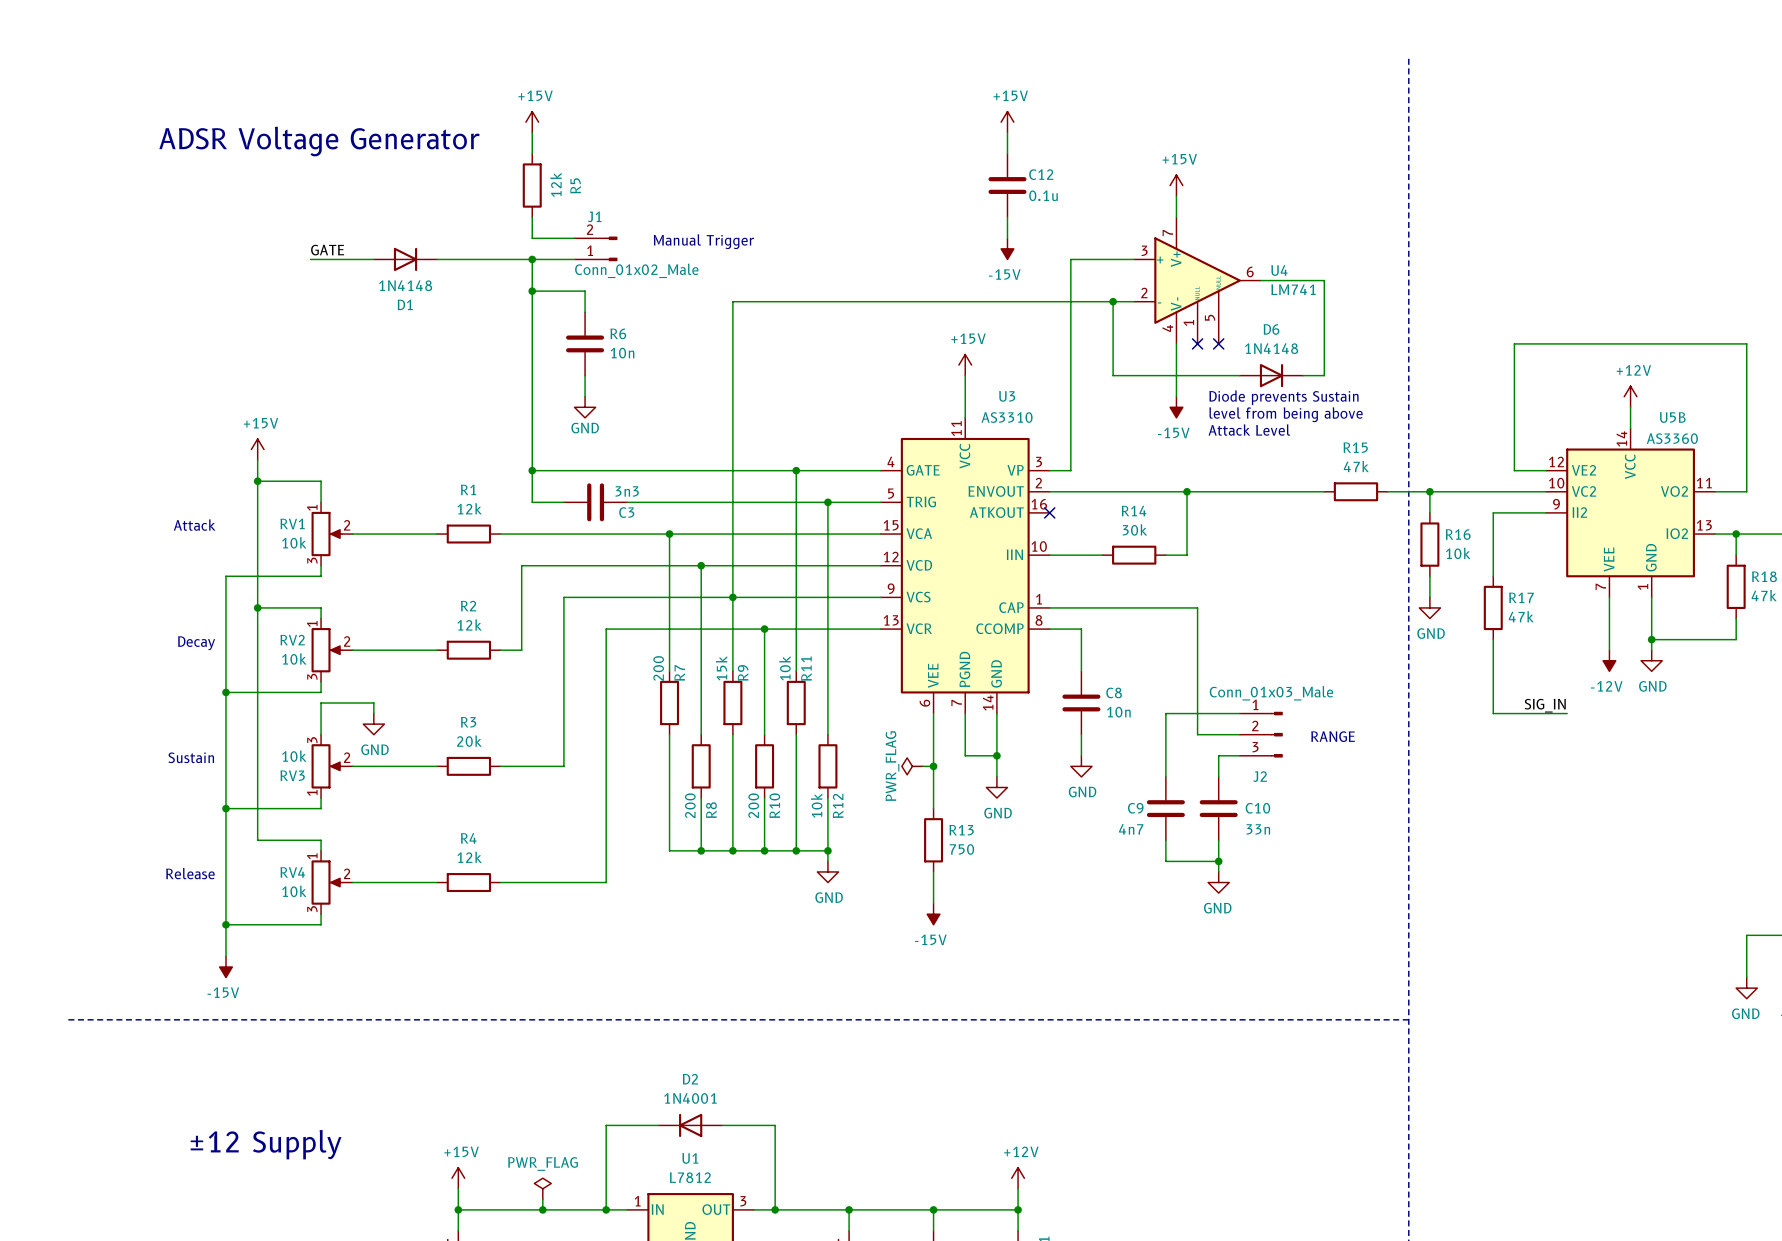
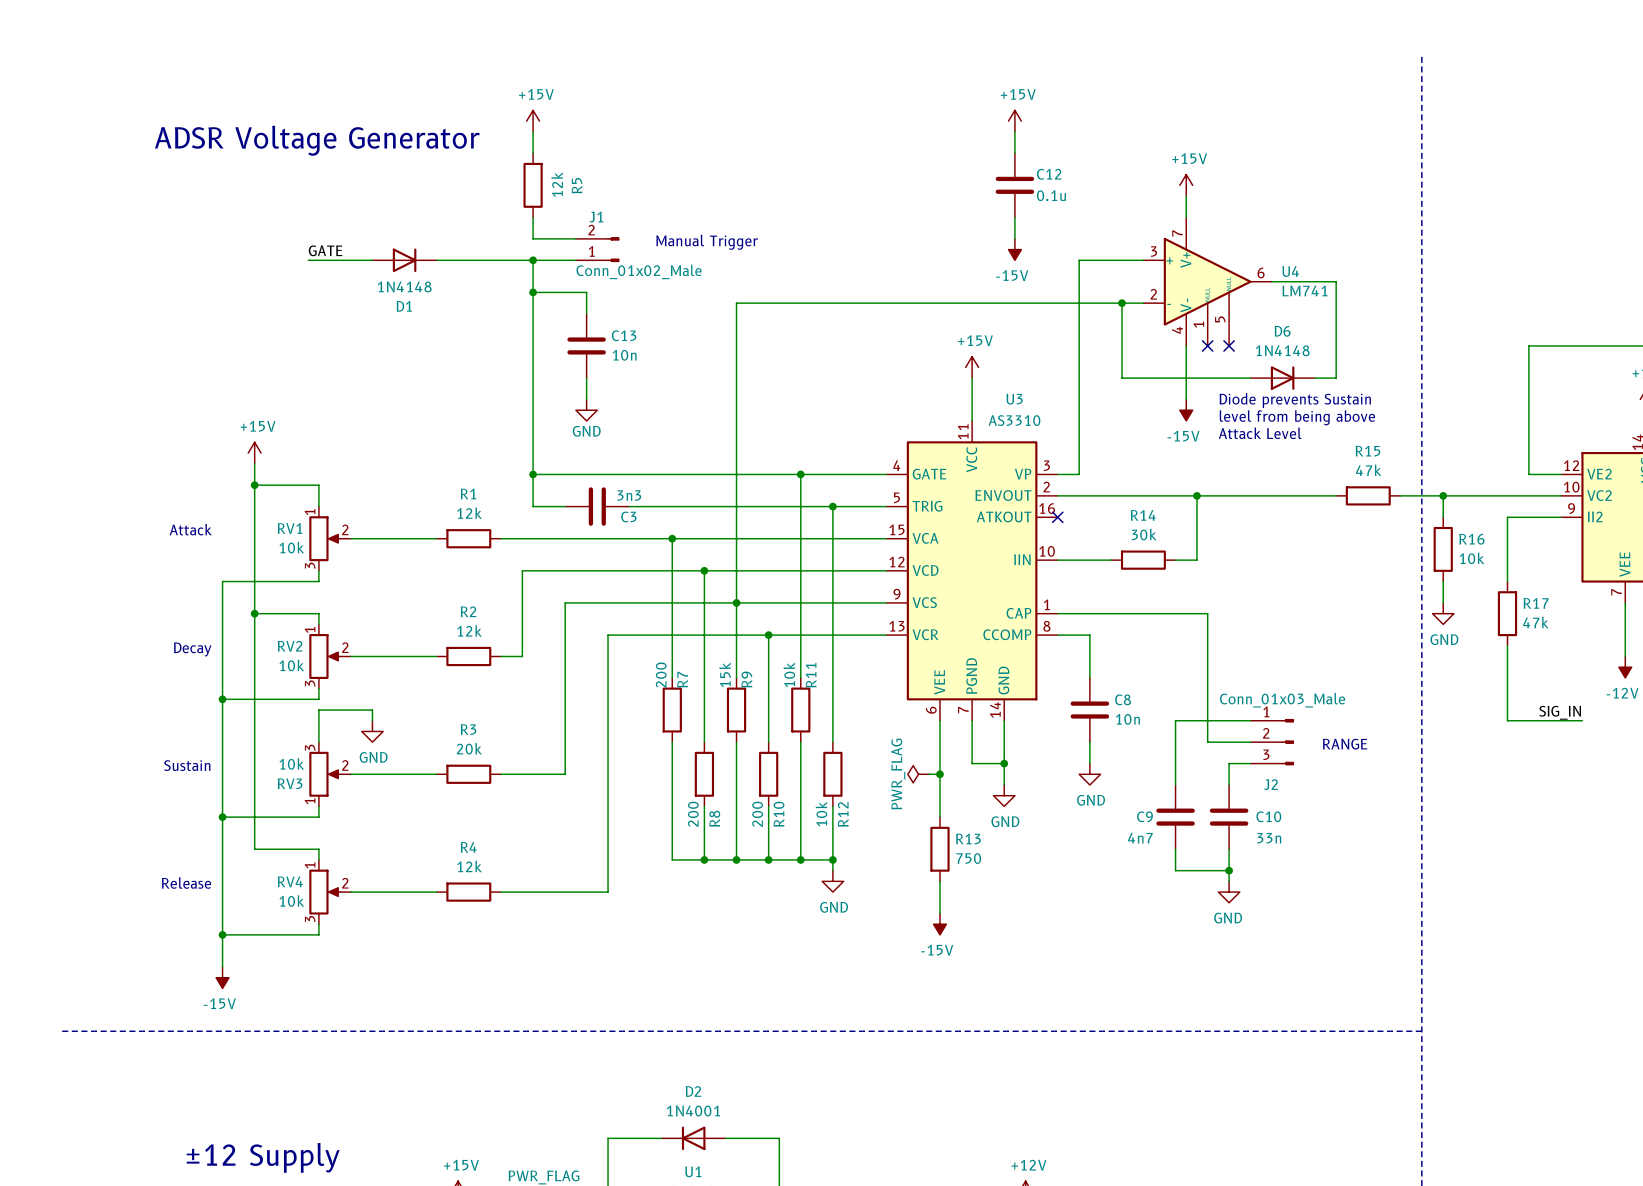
R6 name: R6 (618, 333) -> C13 (624, 335)

